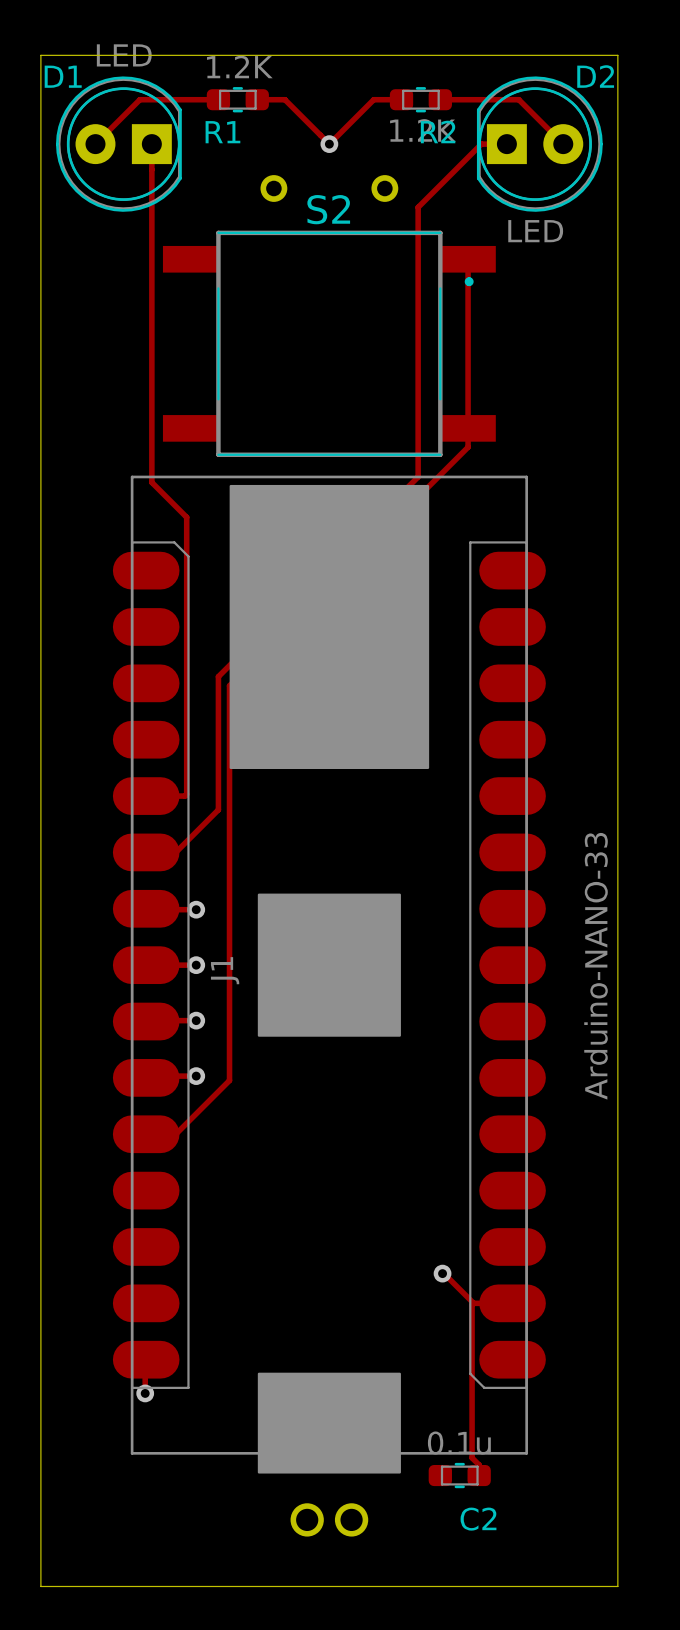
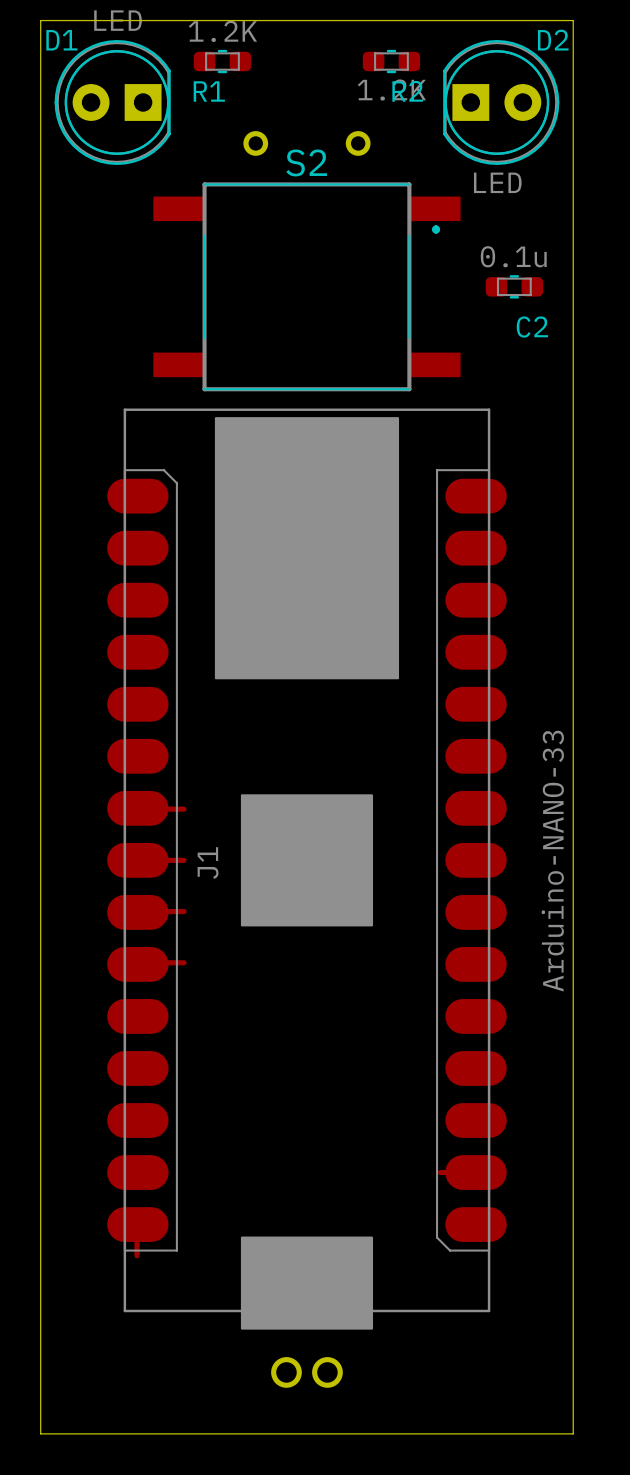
track: (218, 99) (139, 99) (95, 144) -> none
track: (257, 99) (285, 99) (329, 144) (373, 99) (401, 99) -> none
track: (440, 99) (518, 99) (563, 144) -> none
track: (151, 144) (151, 482) (186, 517) (186, 794) (185, 796) (146, 796) -> none
via: (329, 144) -> none
track: (506, 144) (481, 144) (418, 207) (418, 476) (218, 676) (218, 809) (175, 852) (146, 852) -> none
track: (468, 259) (468, 447) (229, 685) (229, 1080) (175, 1134) (146, 1134) -> none
via: (196, 909) -> none
via: (196, 965) -> none
via: (196, 1020) -> none
via: (196, 1076) -> none
track: (442, 1273) (473, 1303) (472, 1305) (472, 1457) (479, 1464) (479, 1475) -> none
via: (442, 1273) -> none
via: (145, 1393) -> none
C2 position: (459, 1475) -> (514, 286)

